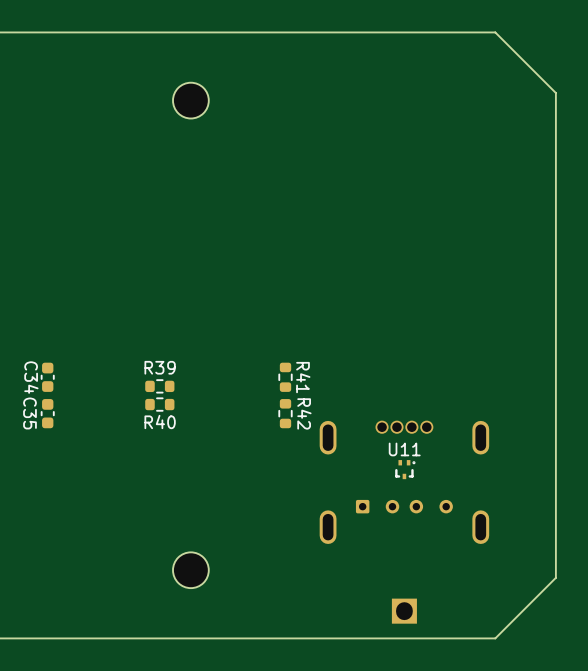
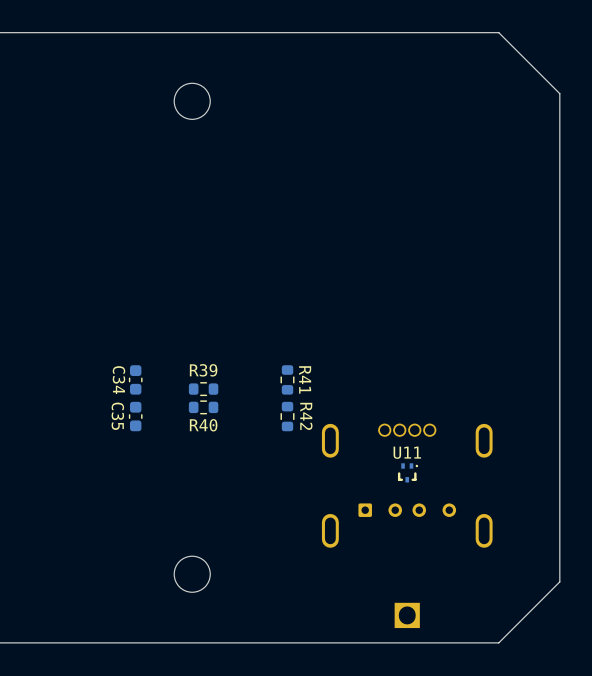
C34 position: (47, 377) -> (135, 379)
R39 position: (159, 386) -> (203, 389)
R40 position: (159, 404) -> (203, 407)
C35 position: (47, 413) -> (135, 416)

